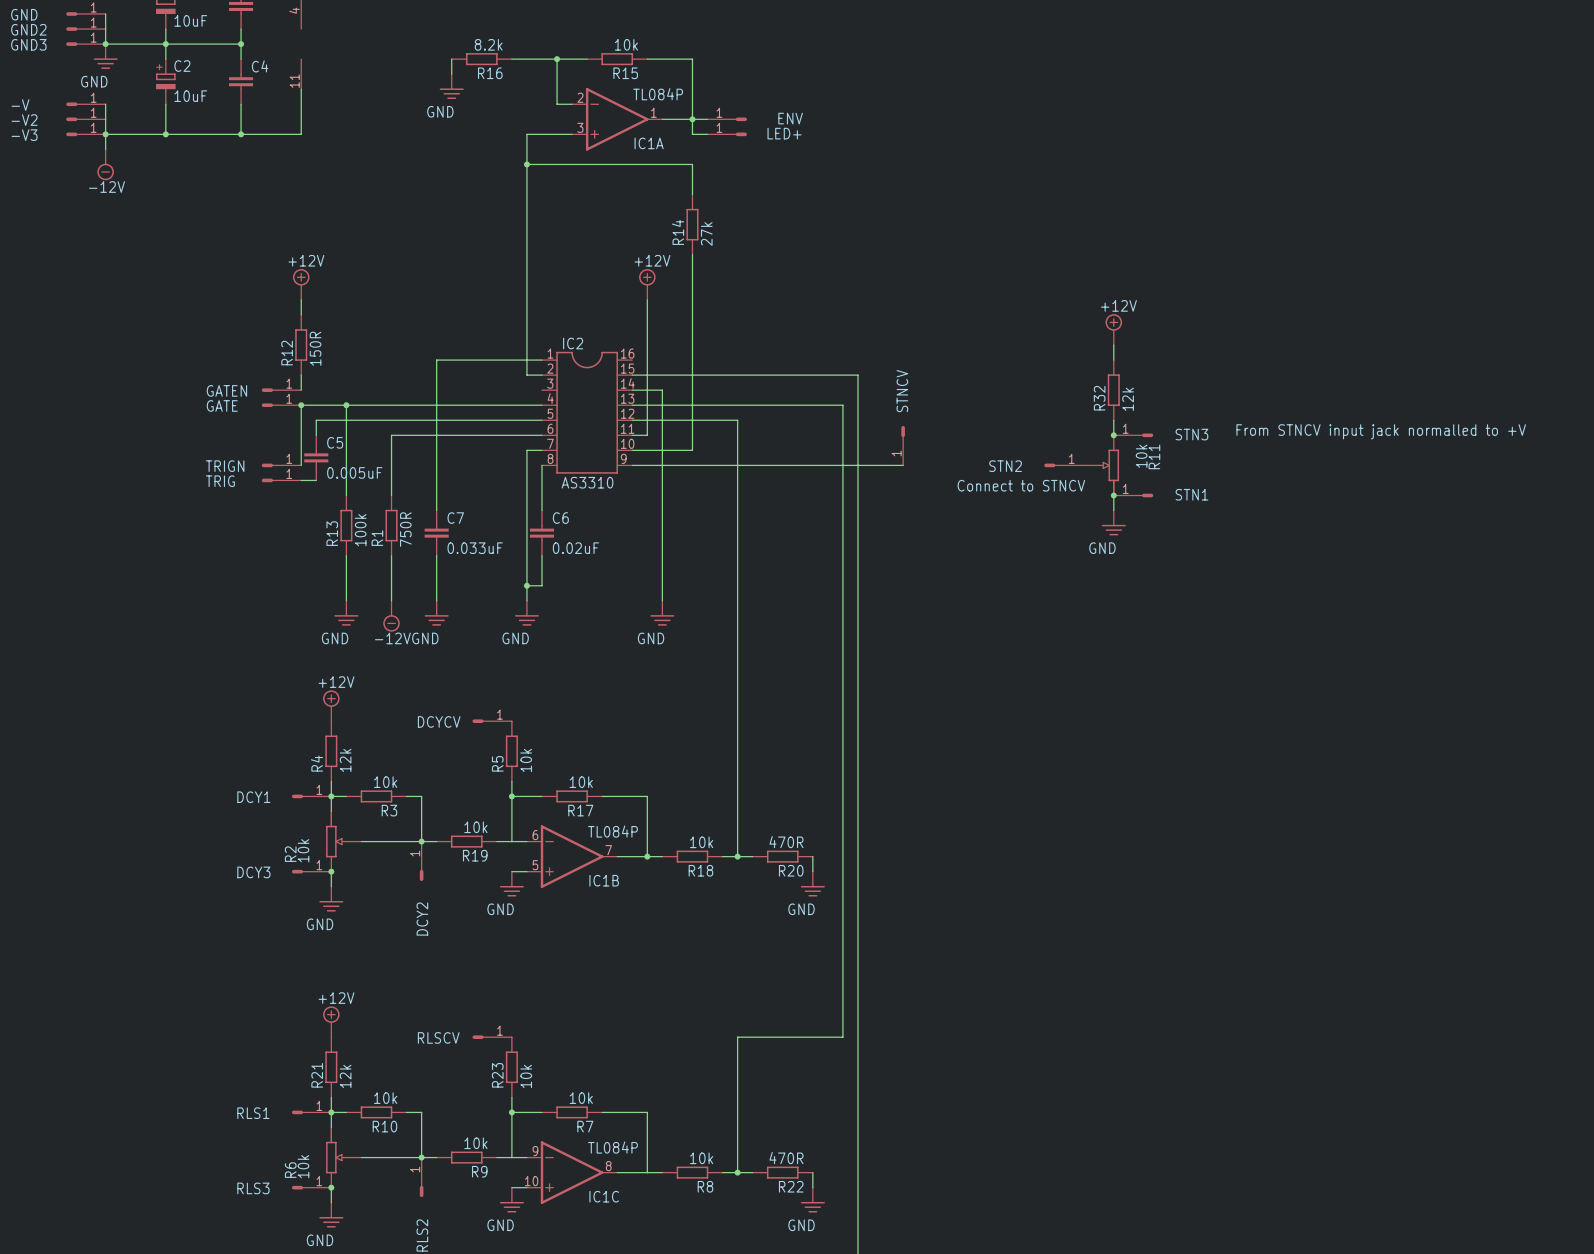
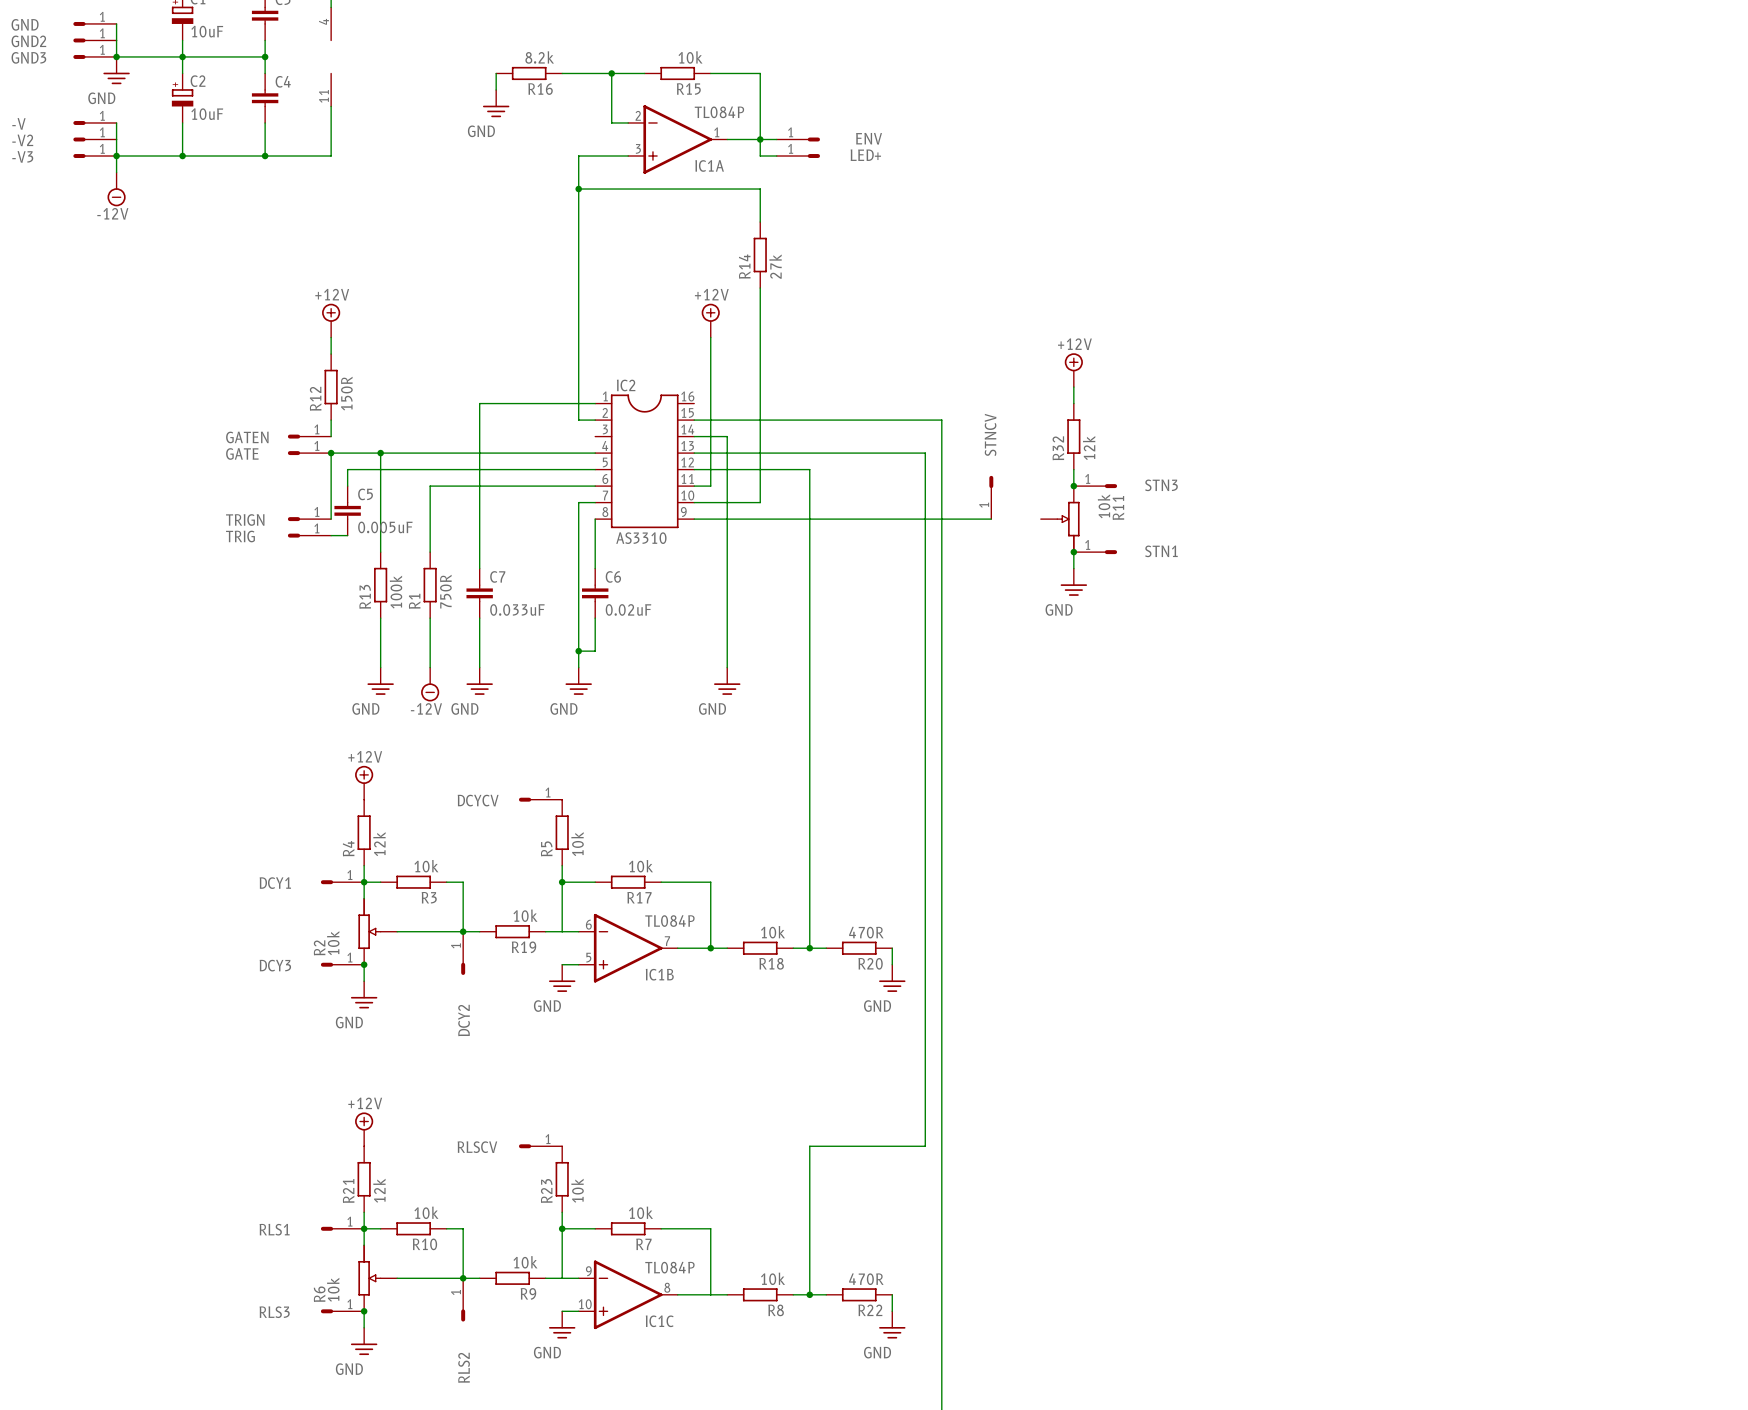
power symbol position: +12V (1113, 329) -> +12V (1073, 370)
wire: (1113, 345) (1113, 360) -> (1073, 387) (1073, 403)
R32 position: (1113, 390) -> (1073, 436)
wire: (1113, 420) (1113, 435) -> (1073, 469) (1073, 486)
text: From STNCV input jack normalled to +V (1381, 431) -> none
junction: none -> (1073, 486)
junction: (1113, 435) -> none
STN3 position: (1133, 435) -> (1095, 486)
STN2: (1063, 465) -> none
R11 position: (1101, 465) -> (1060, 519)
text: Connect to STNCV (1021, 485) -> none
junction: none -> (1073, 552)
wire: (1113, 495) (1113, 510) -> (1073, 552) (1073, 568)
junction: (1113, 495) -> none
STN1 position: (1133, 495) -> (1095, 552)
power symbol position: GND (1113, 522) -> GND (1073, 582)

